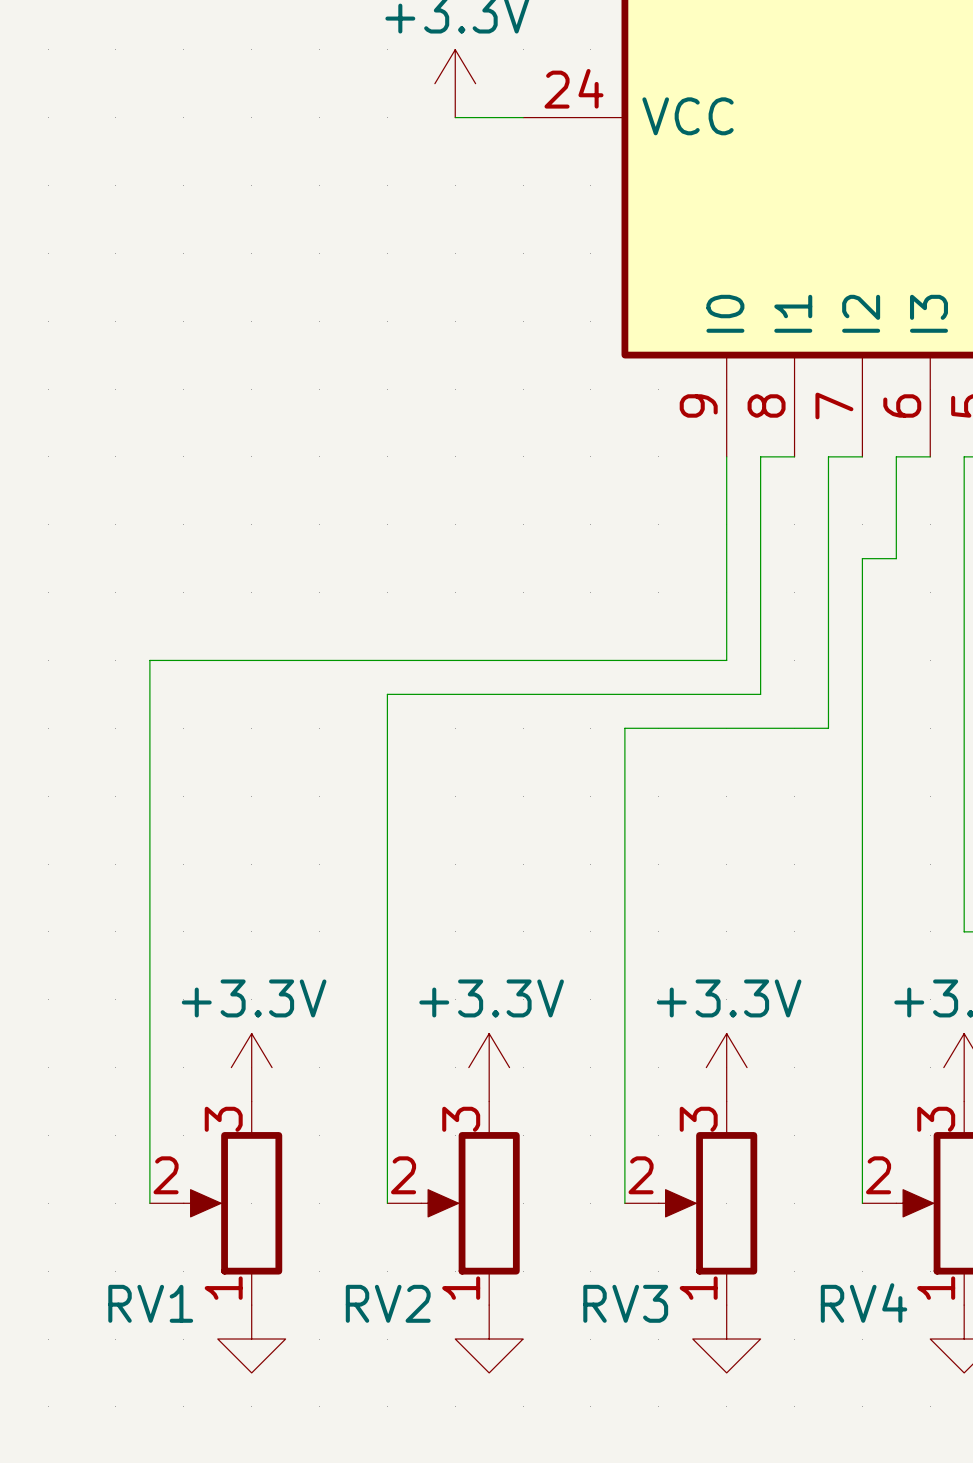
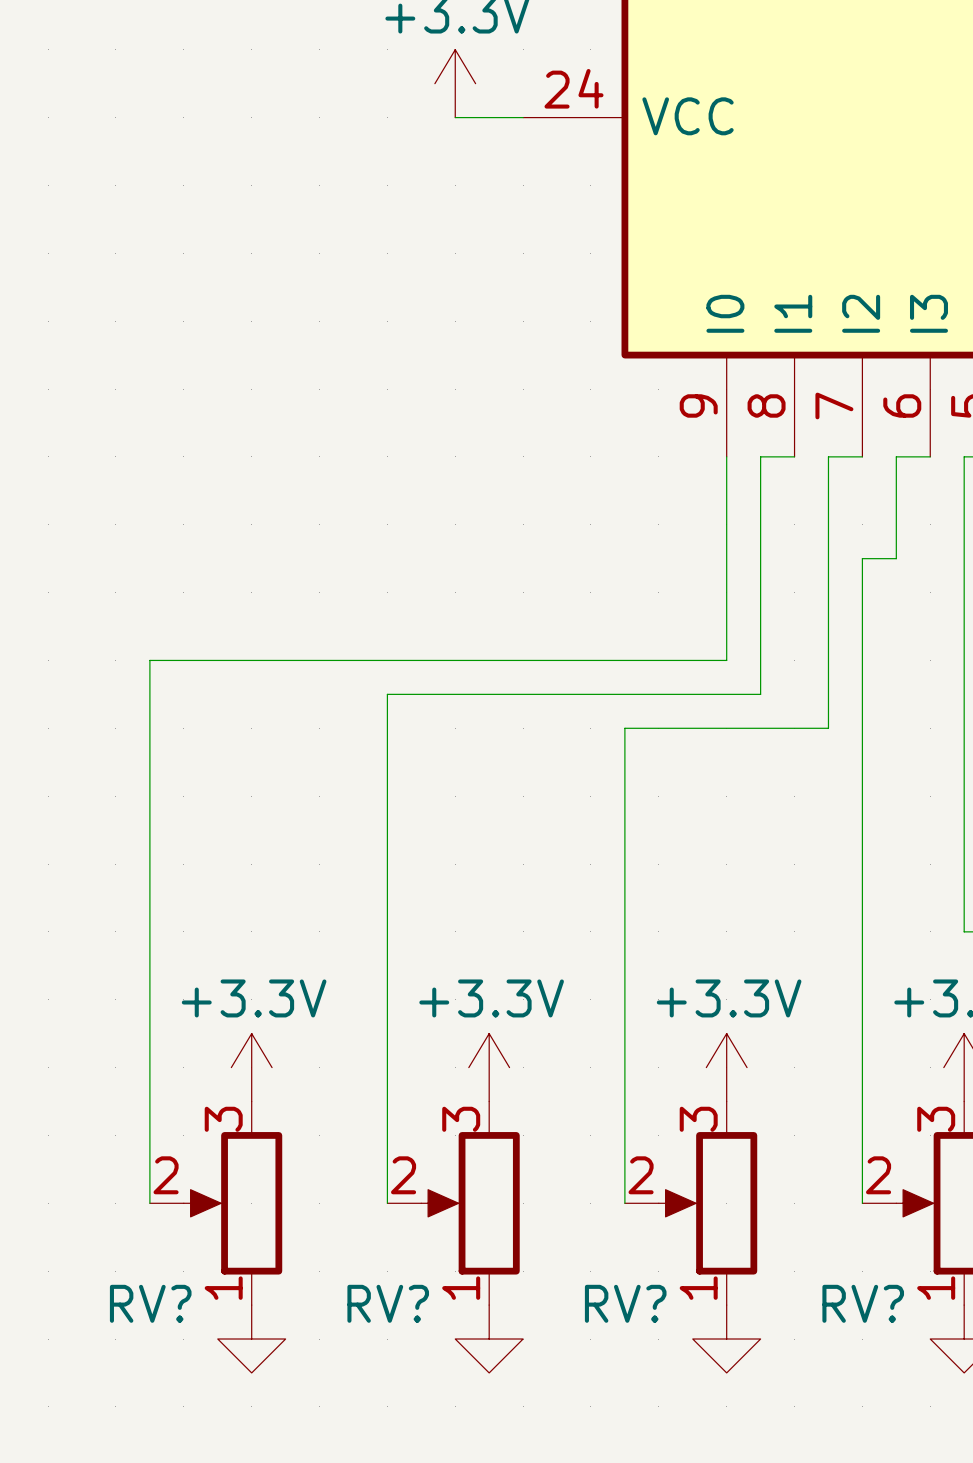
RV1 name: RV1 (150, 1303) -> RV? (150, 1303)
RV2 name: RV2 (388, 1303) -> RV? (388, 1303)
RV3 name: RV3 (625, 1303) -> RV? (625, 1303)
RV4 name: RV4 (864, 1303) -> RV? (863, 1303)

